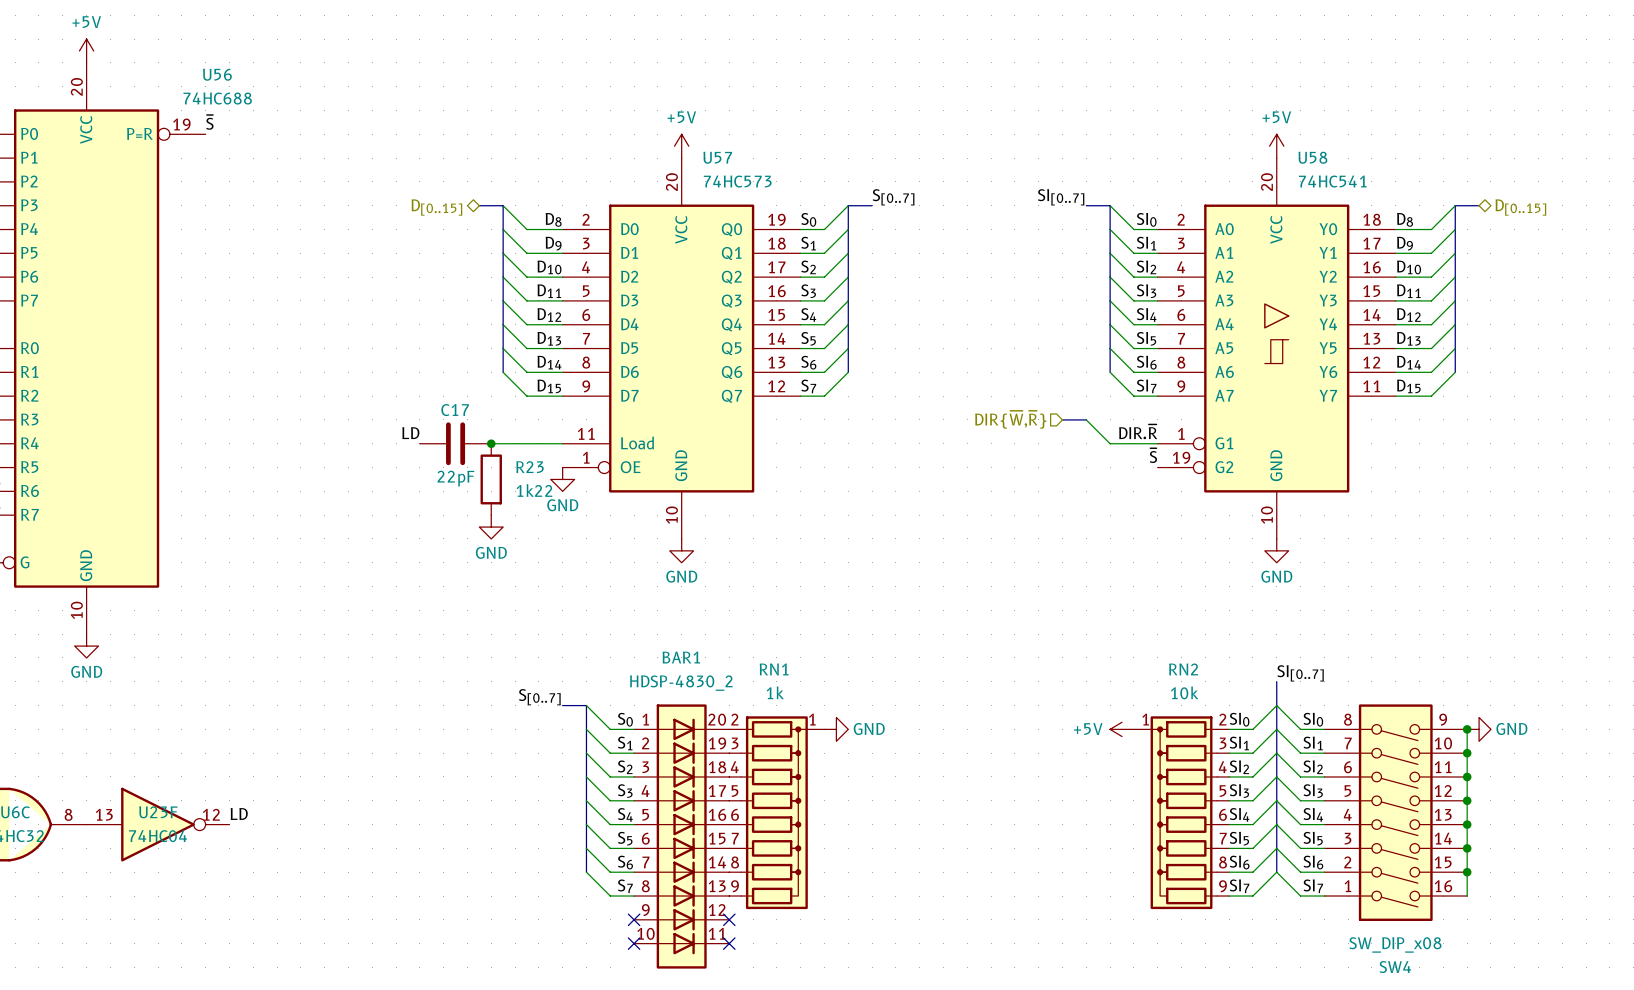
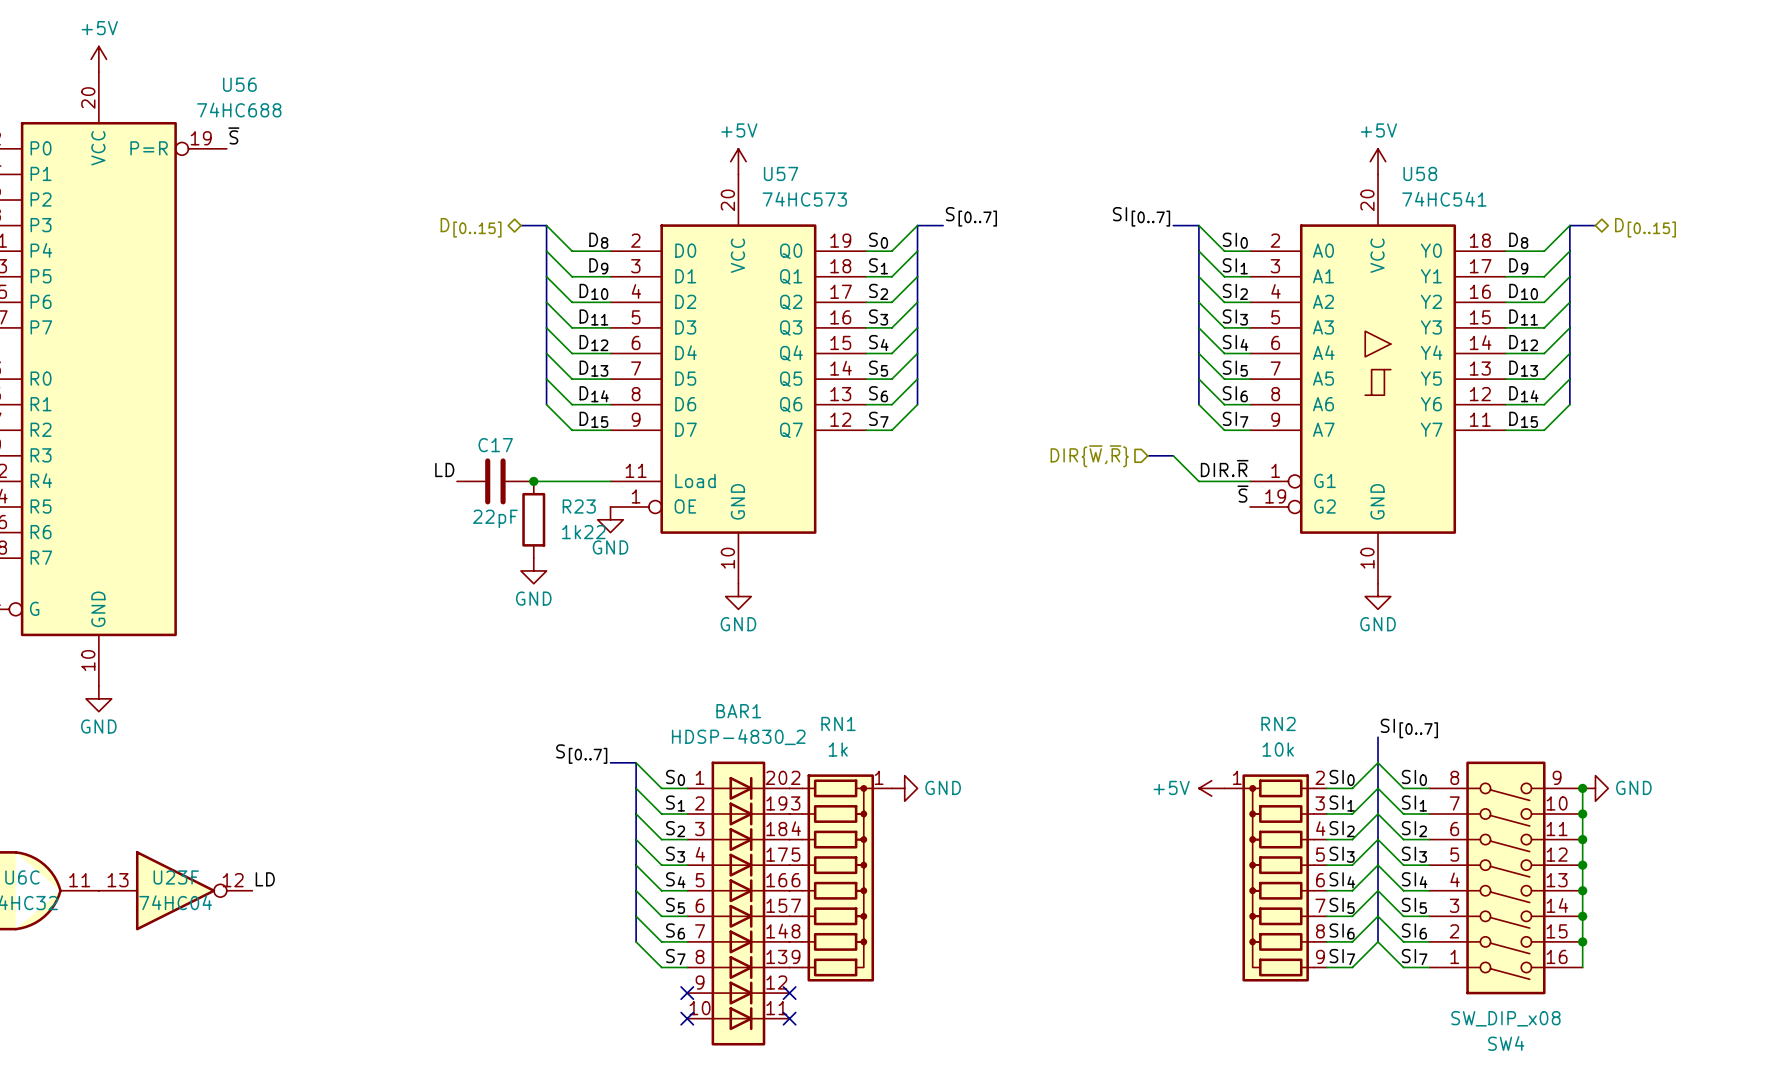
U6C pin number: 8 (68, 814) -> 11 (79, 880)

